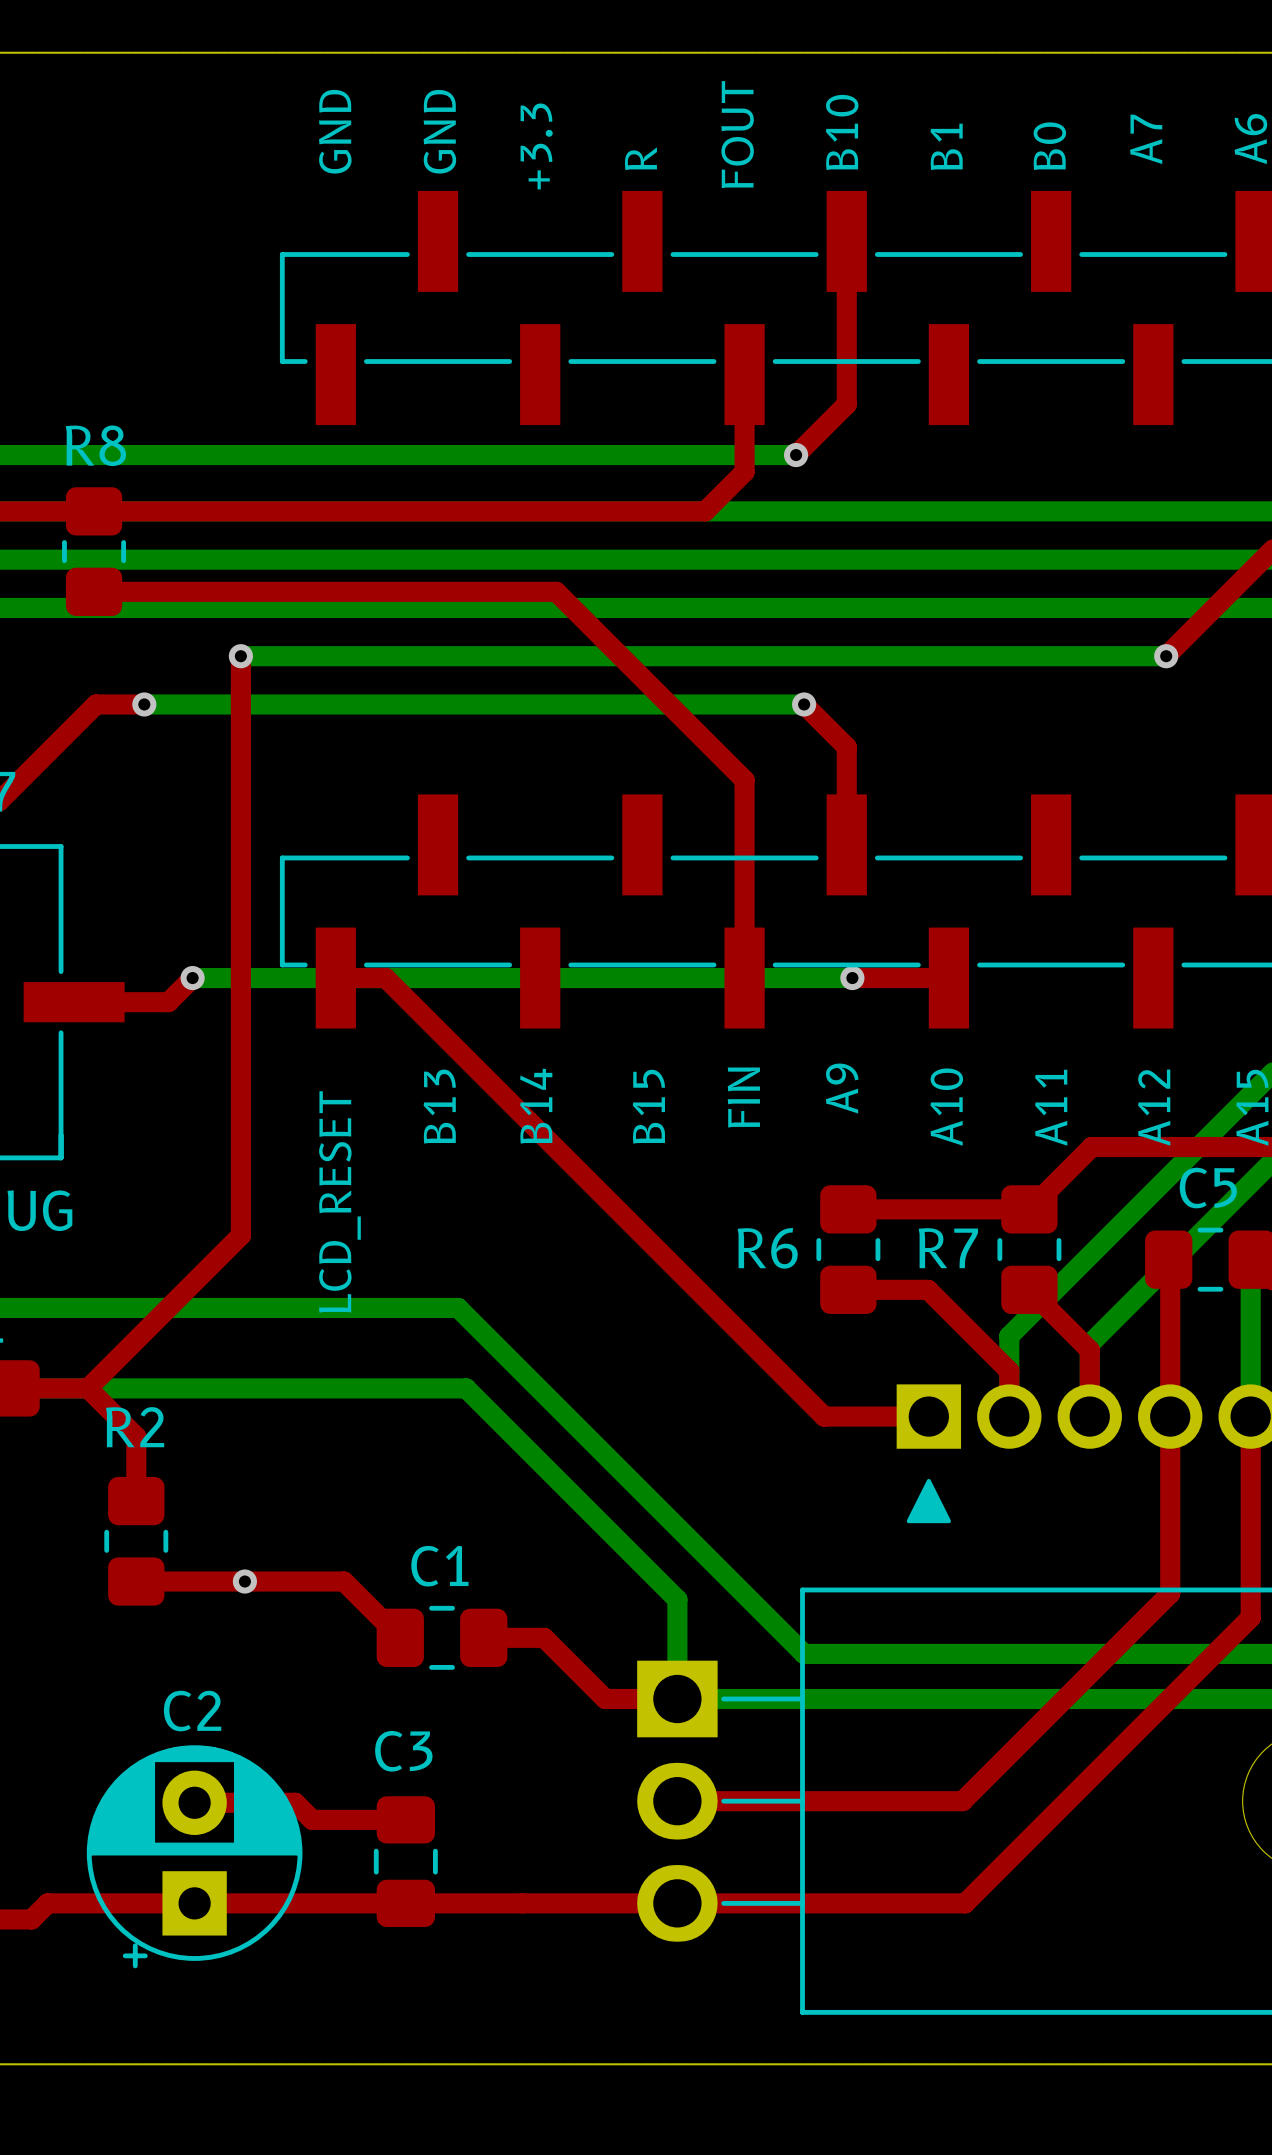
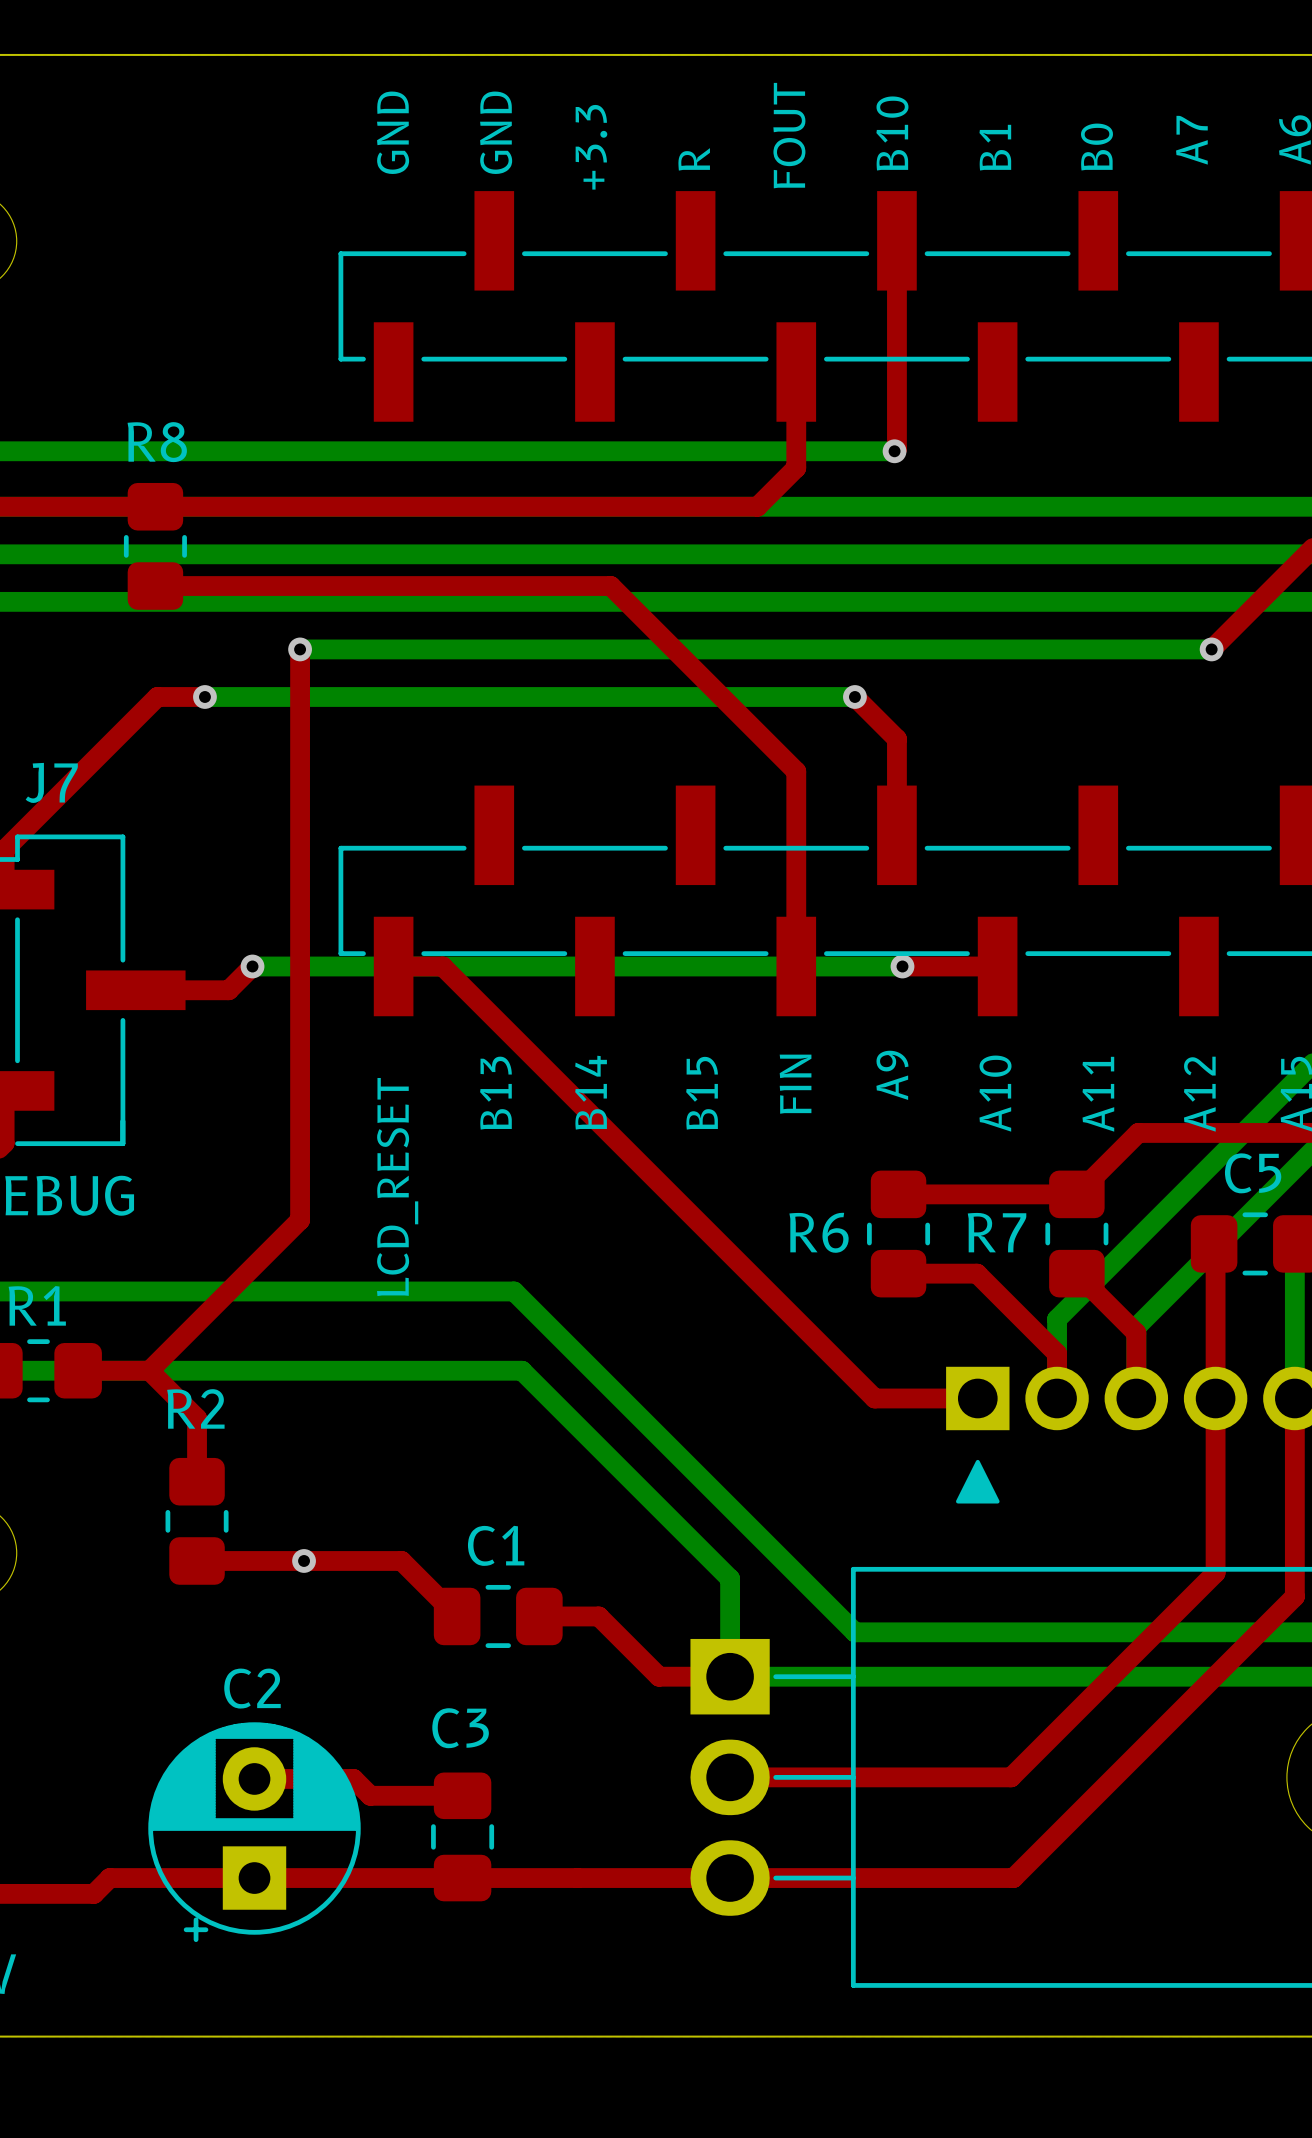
top track: (846, 404) (796, 455) -> (896, 401) (896, 448) (894, 451)
bottom track: none -> (847, 451) (894, 451)
via position: (796, 455) -> (894, 451)

